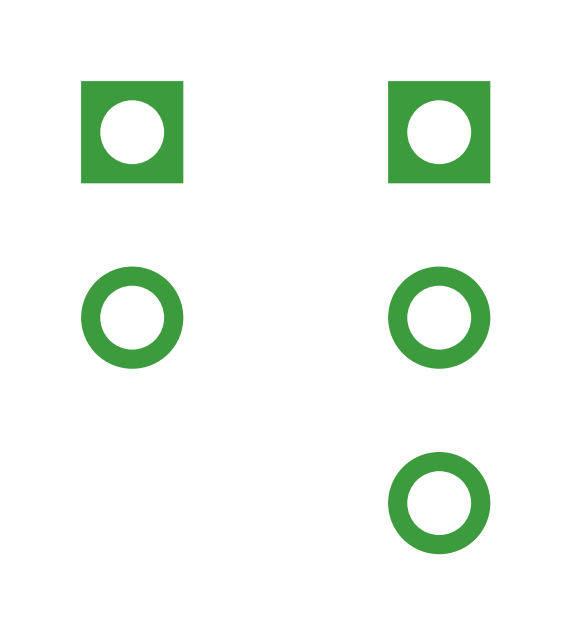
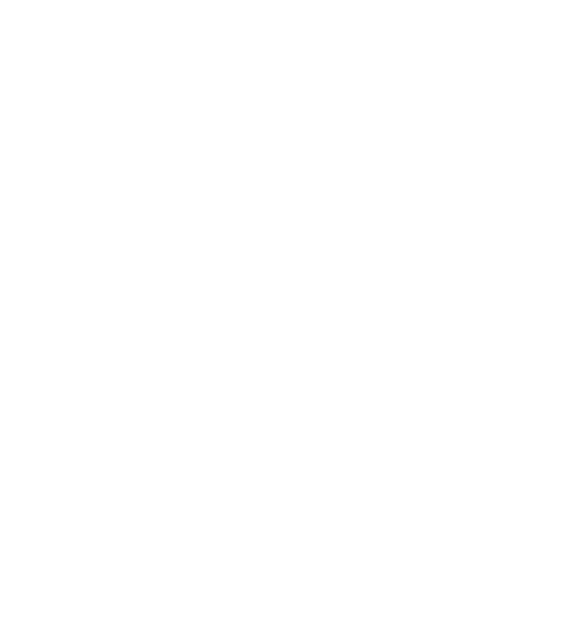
part: (132, 224) -> none
part: (439, 317) -> none

